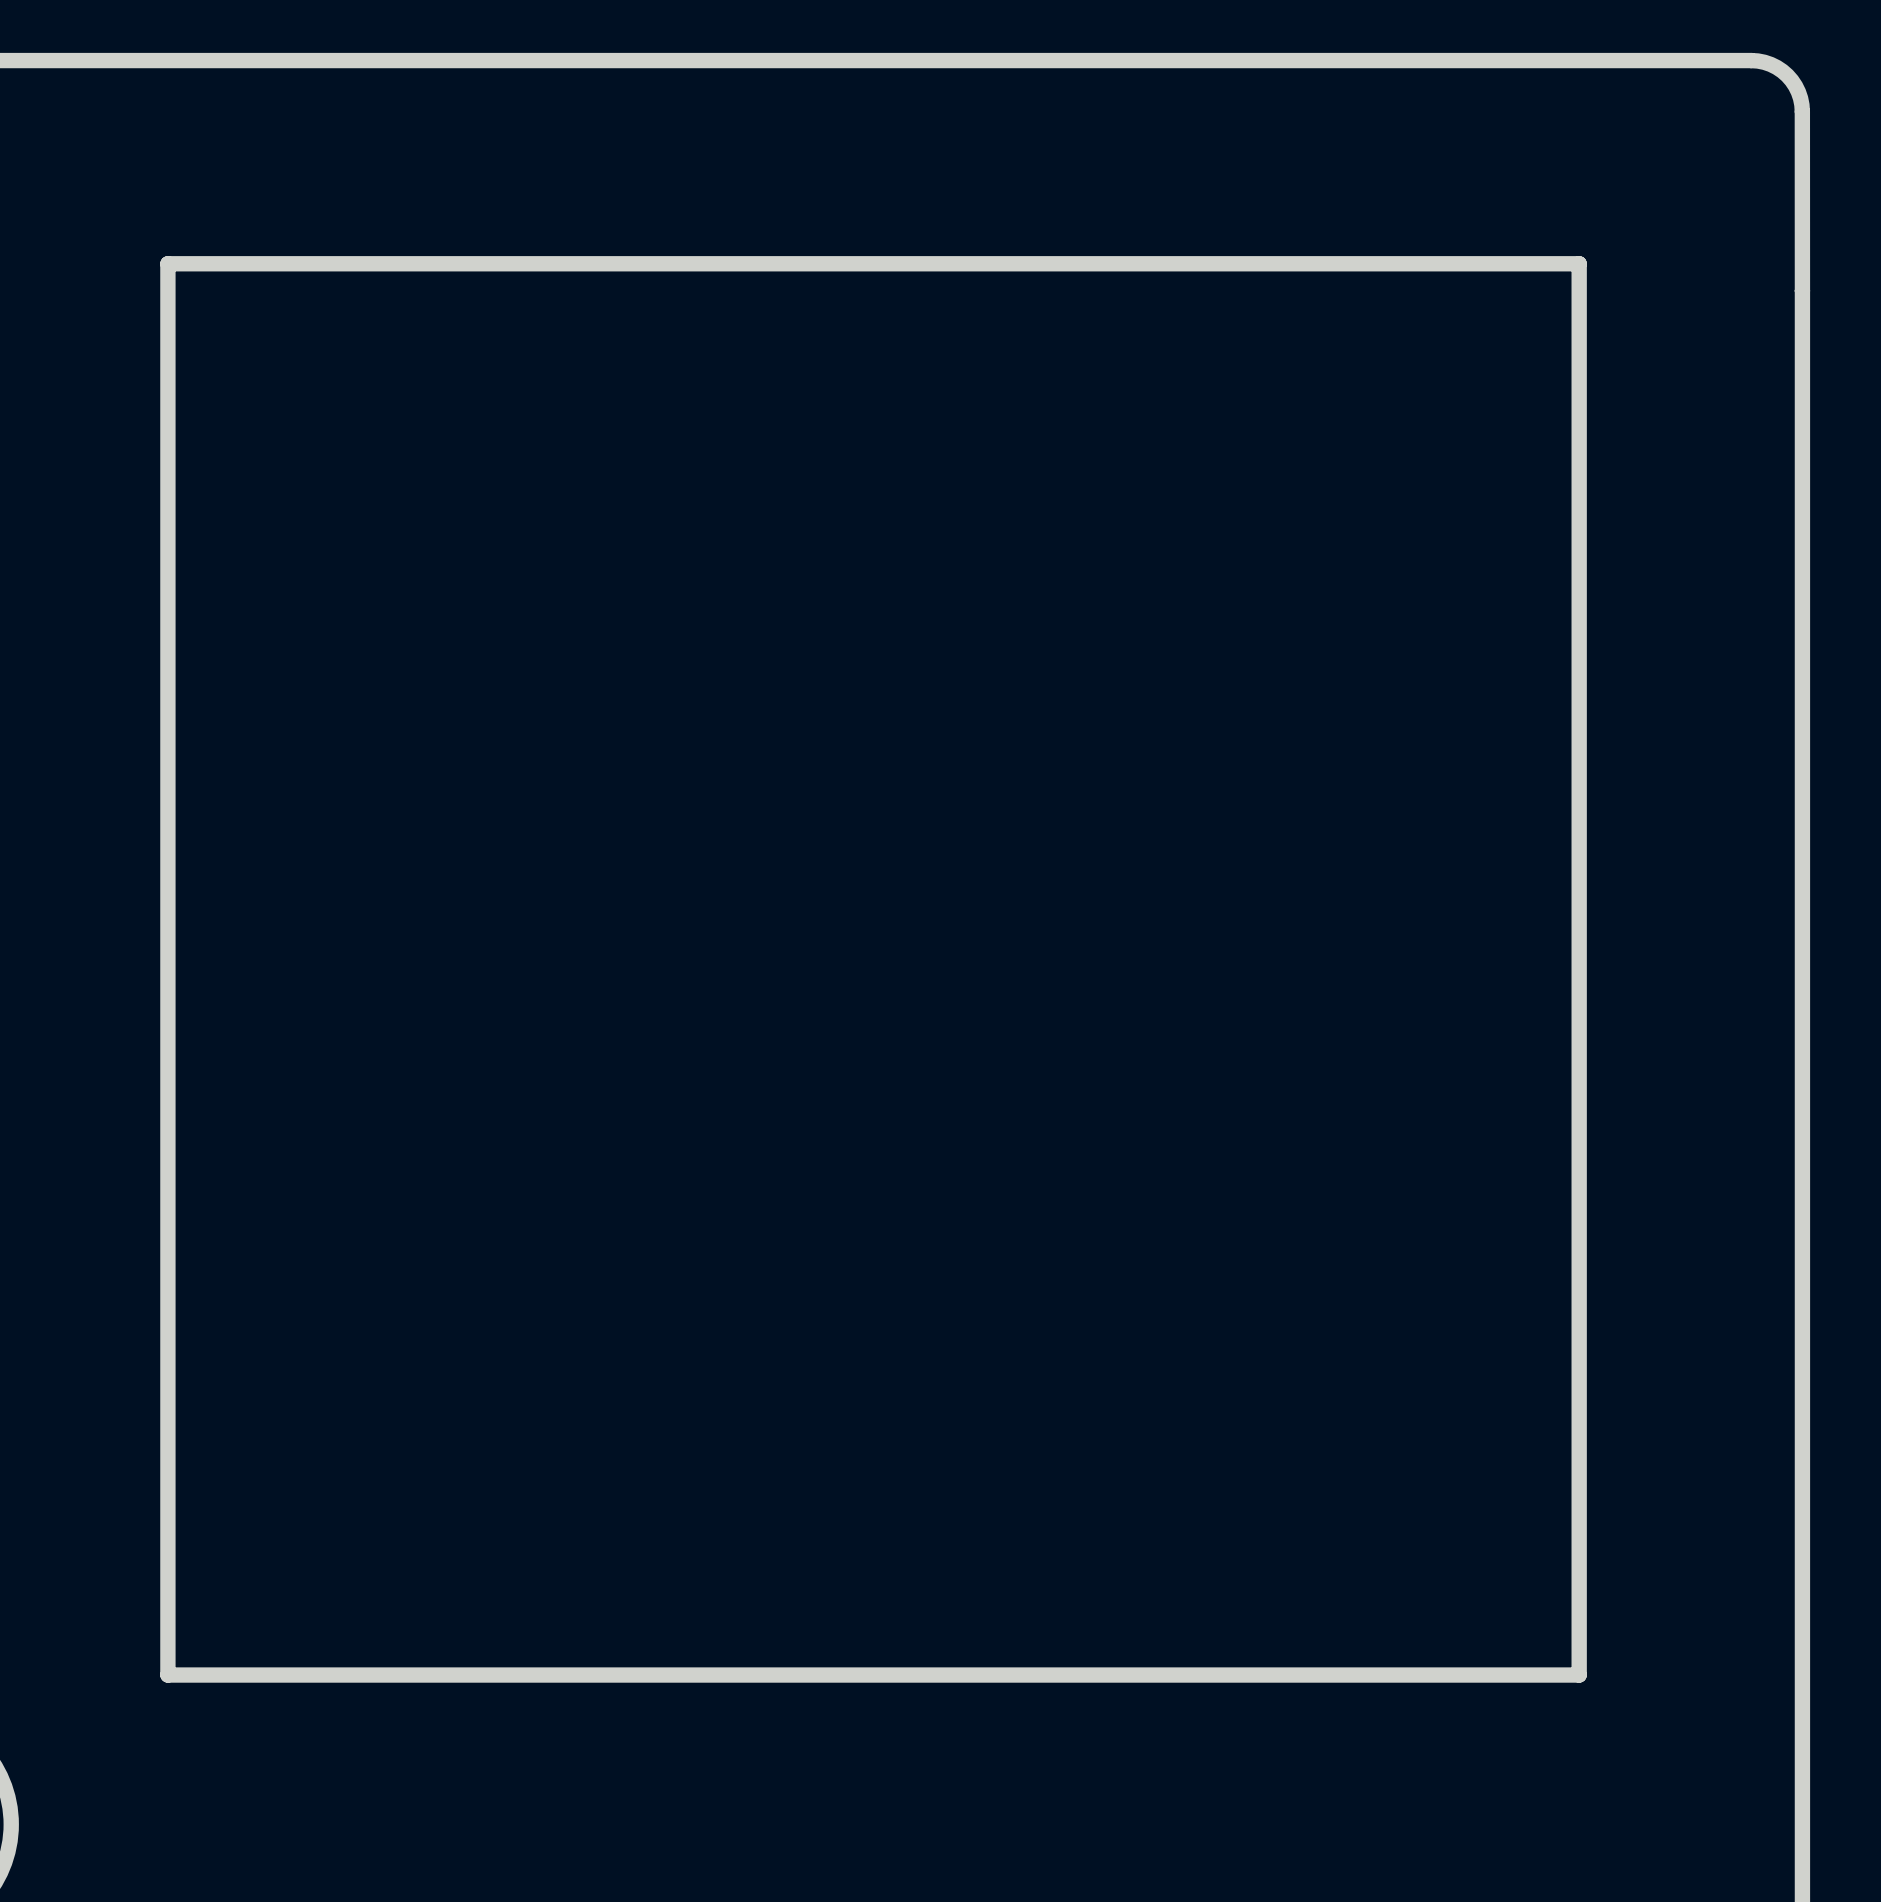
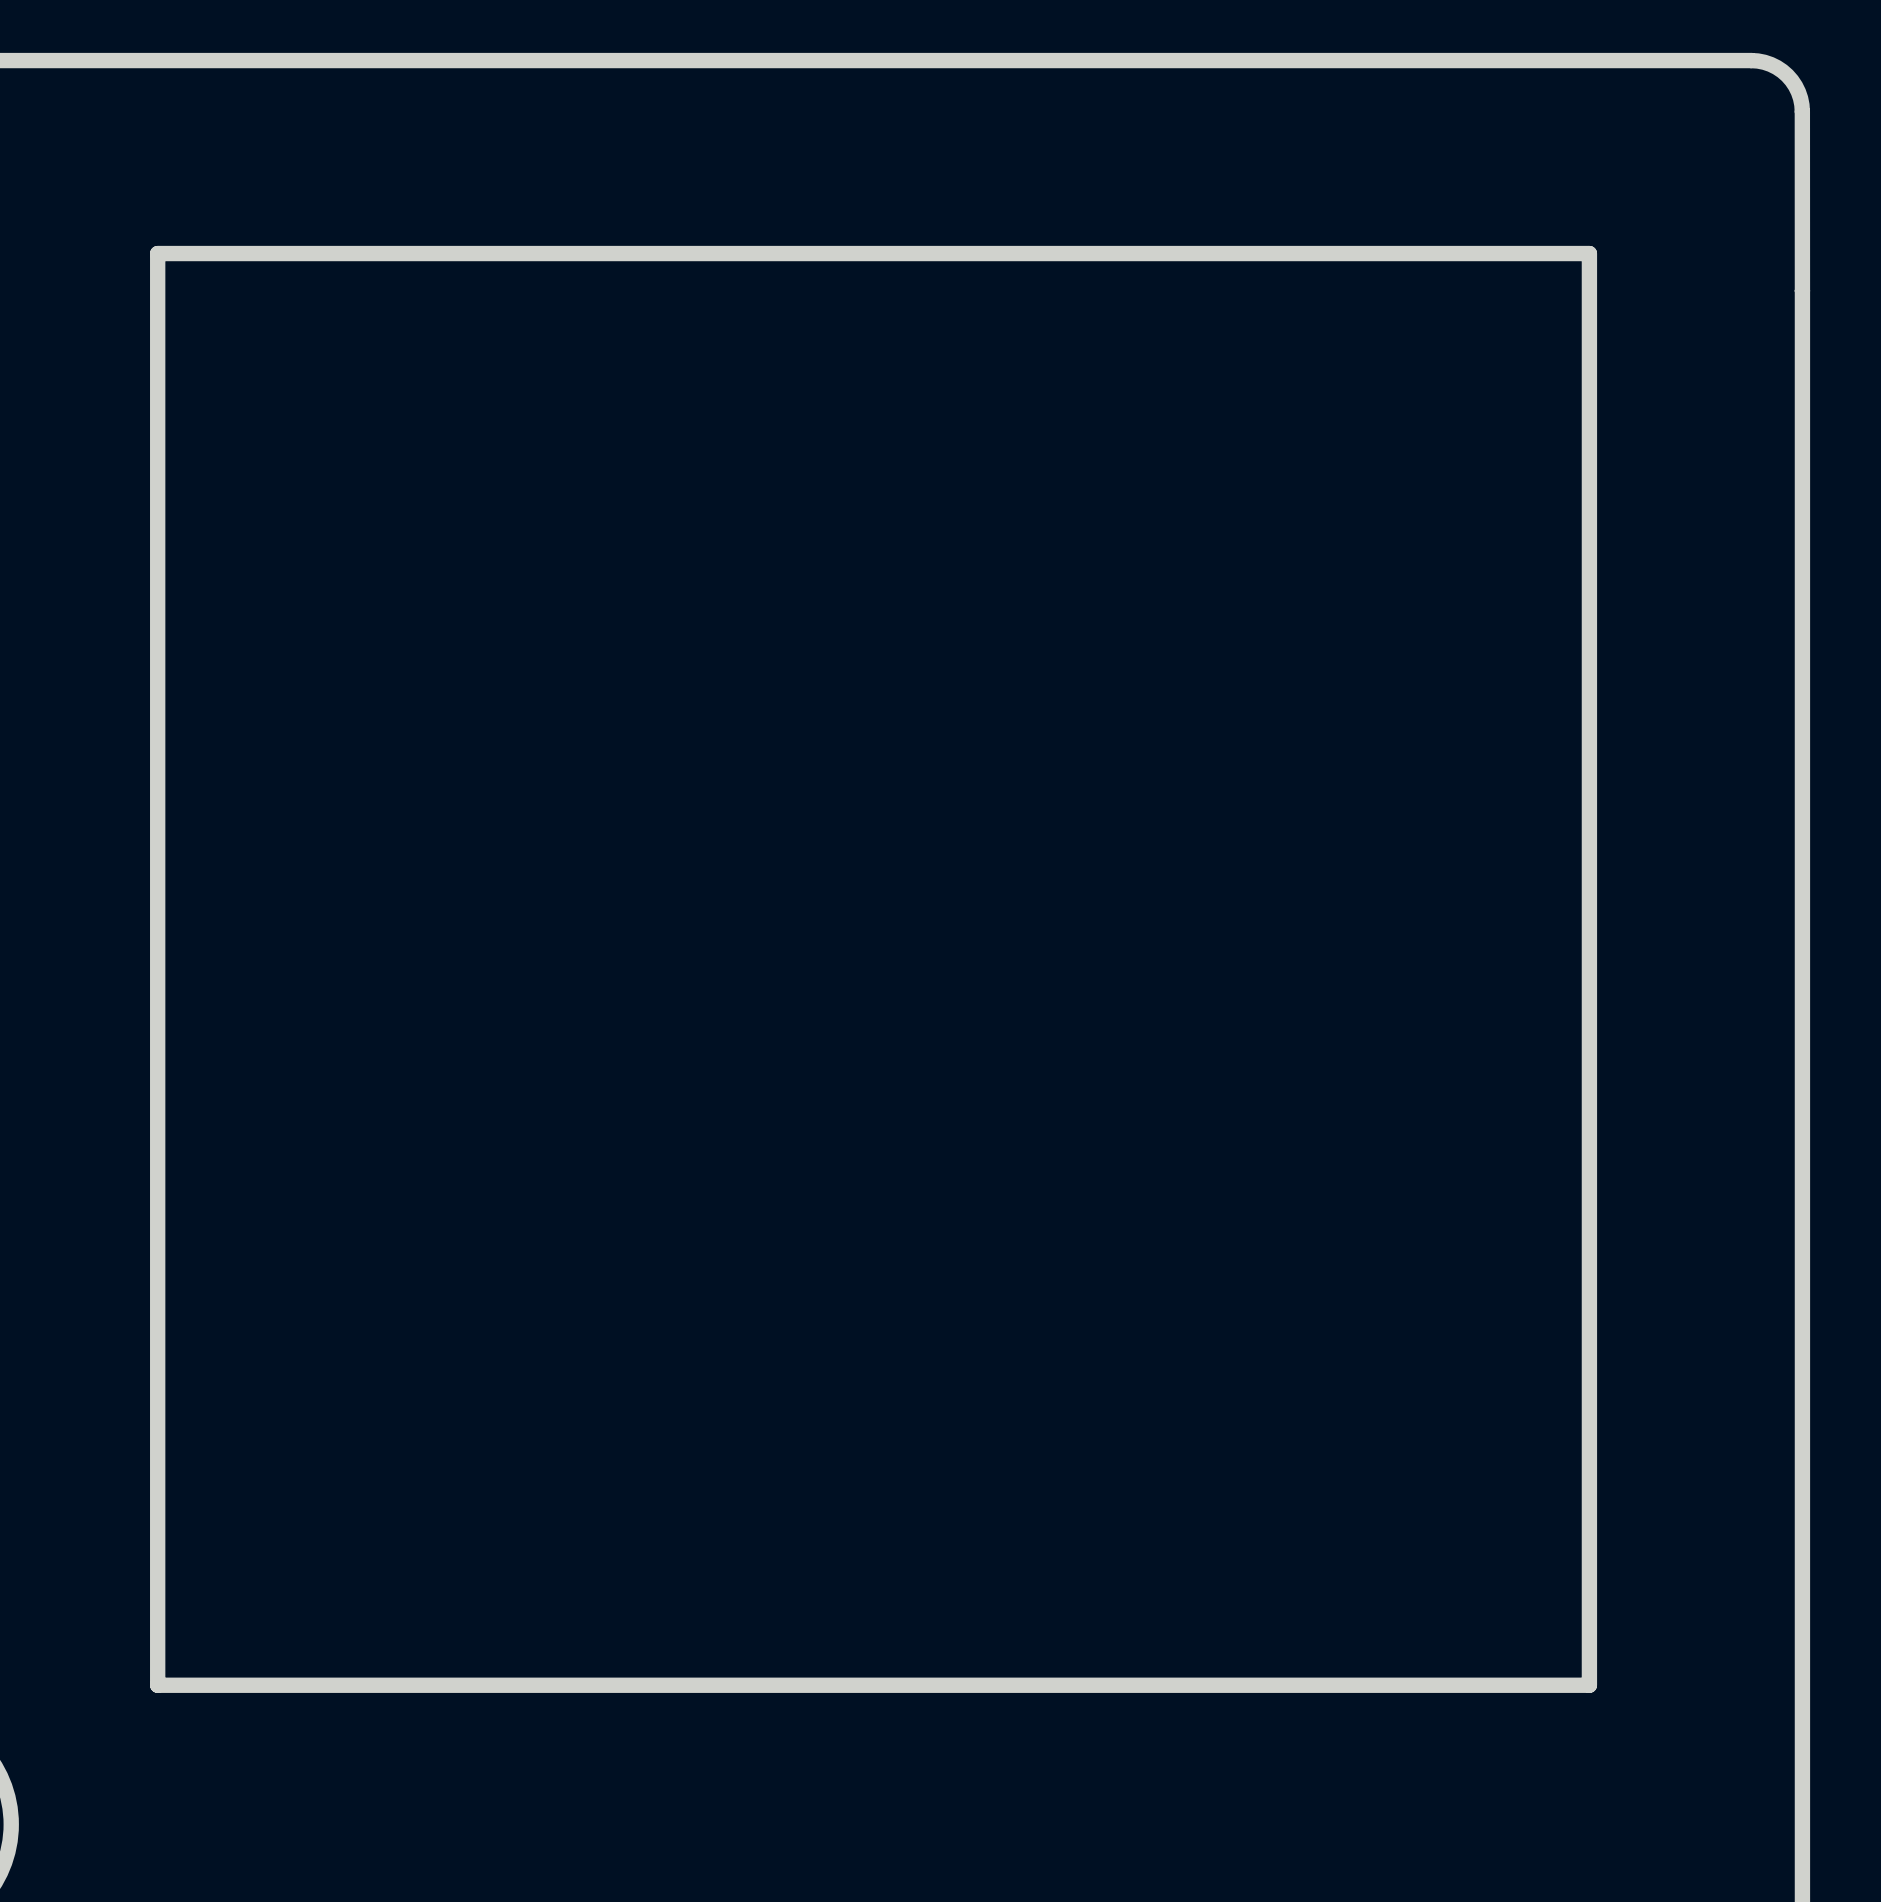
board edge: (167, 263) (1579, 263) (1579, 1675) (167, 1675) (167, 263) -> (157, 253) (157, 1685) (1589, 1685) (1589, 253) (157, 253)

